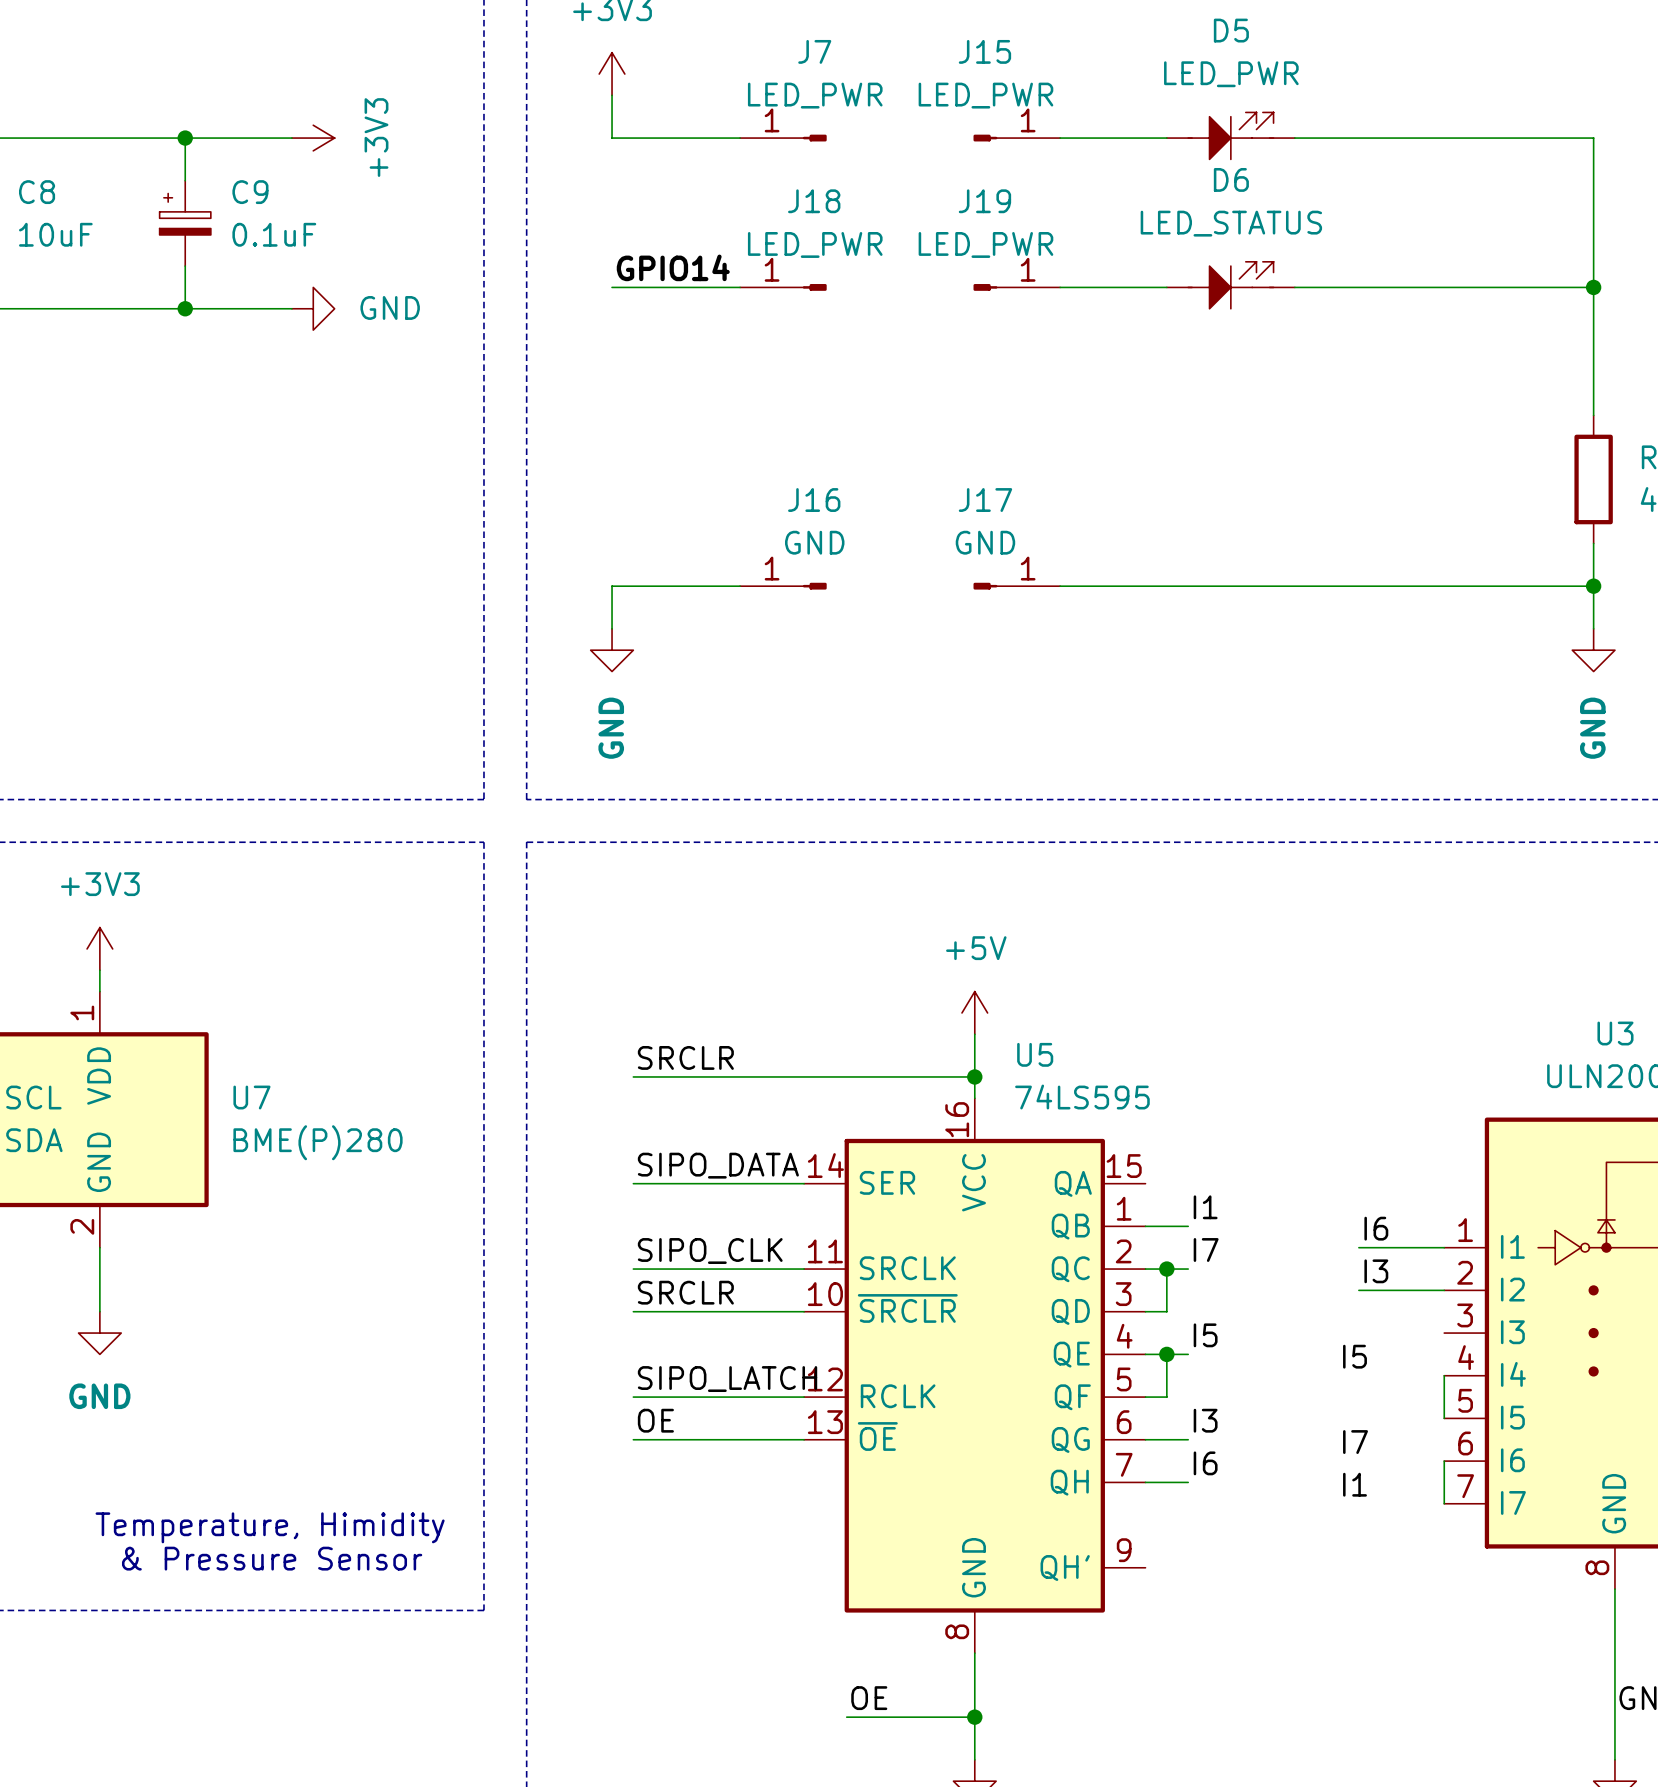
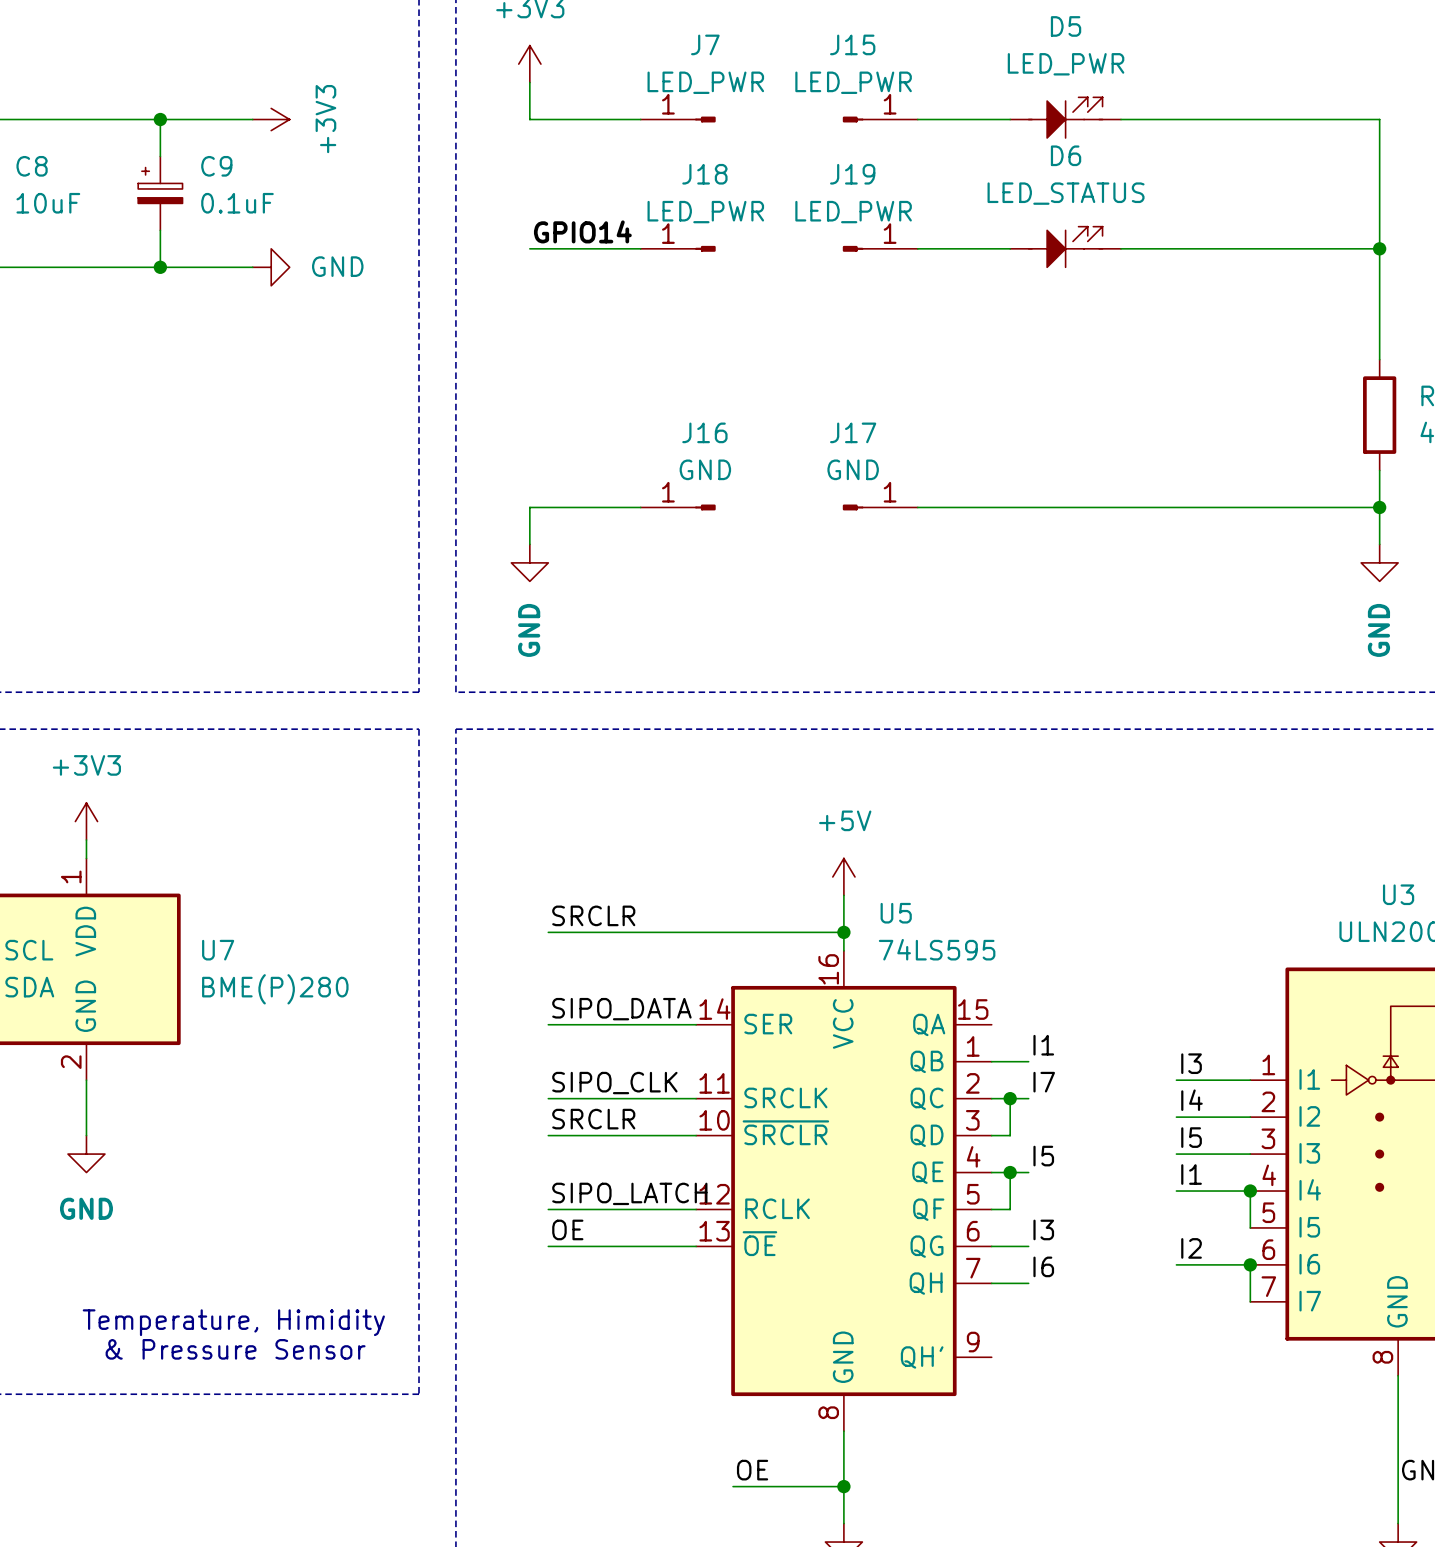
label: I6 (1376, 1228) -> I3 (1191, 1063)
label: I3 (1376, 1271) -> I4 (1191, 1100)
wire: none -> (1176, 1154) (1250, 1154)
label position: I5 (1354, 1356) -> I5 (1191, 1137)
wire: none -> (1176, 1191) (1250, 1191)
junction: none -> (1250, 1191)
label: I7 (1355, 1442) -> none
label: none -> I2 (1191, 1248)
wire: none -> (1176, 1264) (1250, 1264)
junction: none -> (1250, 1264)
label position: I1 (1354, 1484) -> I1 (1191, 1174)

